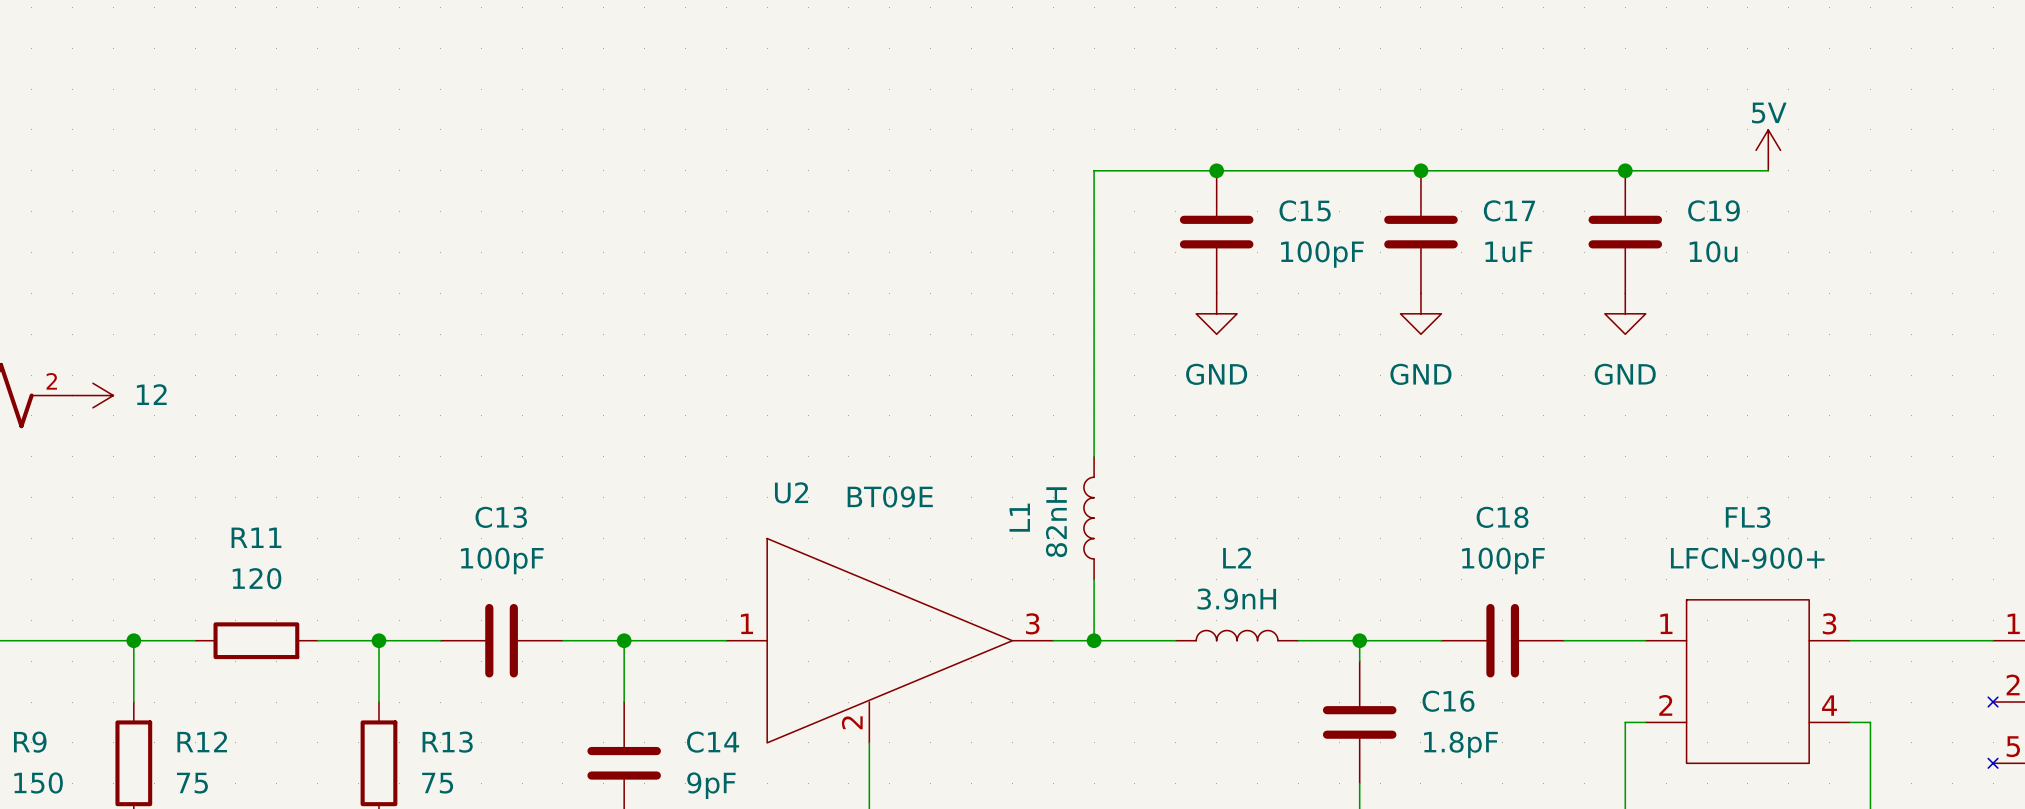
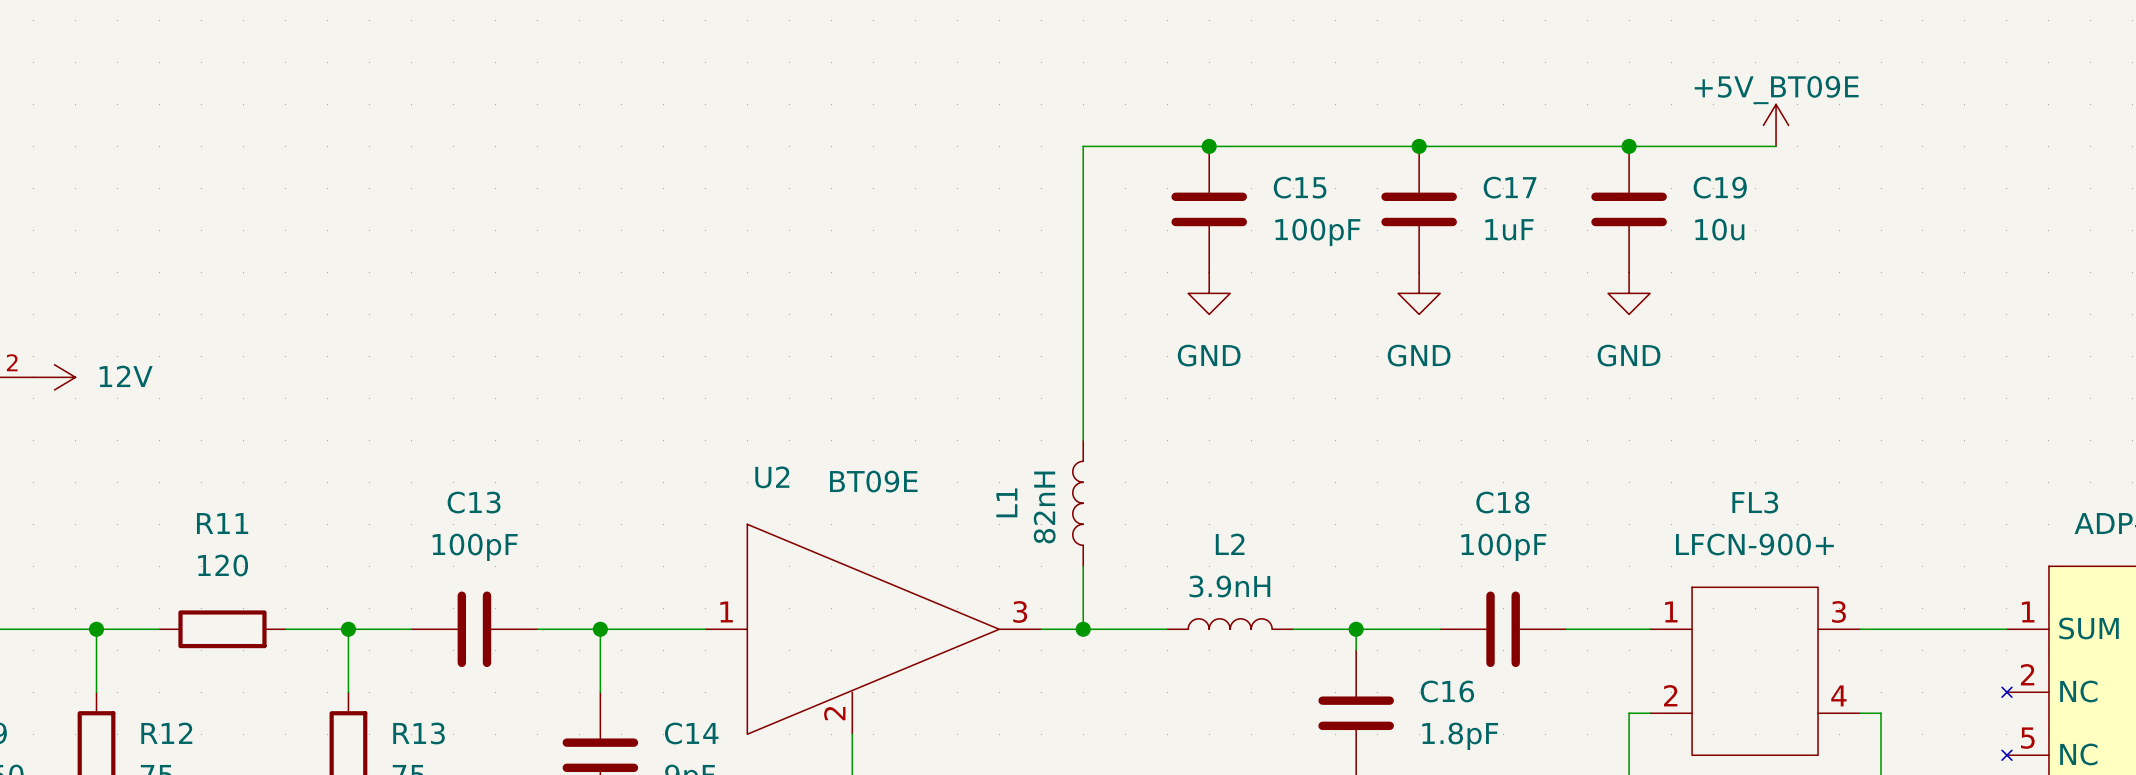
power symbol: 5V (1768, 150) -> +5V_BT09E (1776, 125)
power symbol: 12 (92, 395) -> 12V (54, 377)

